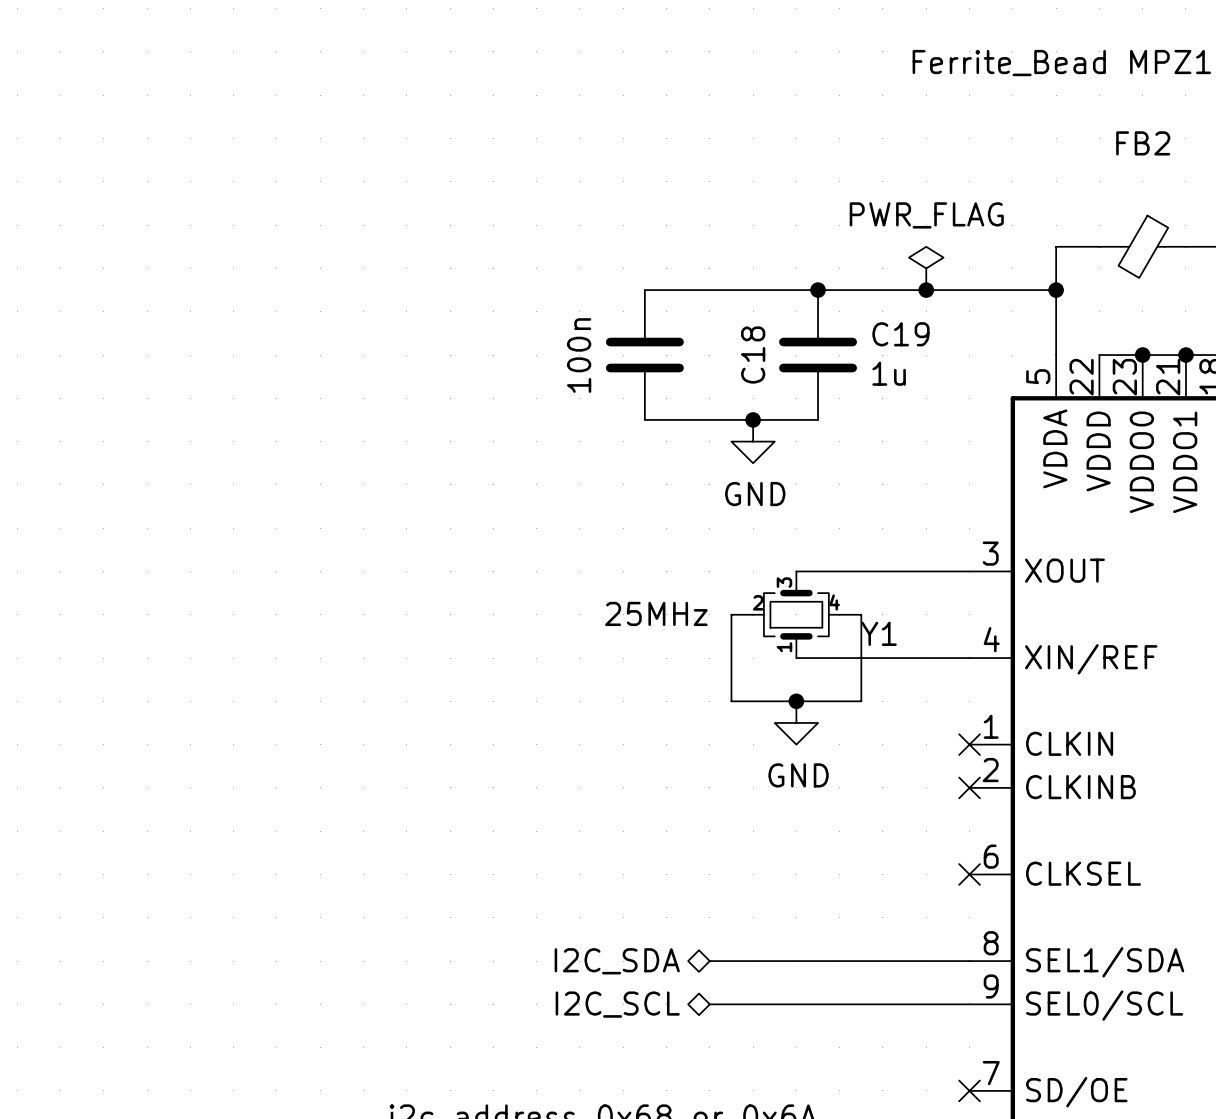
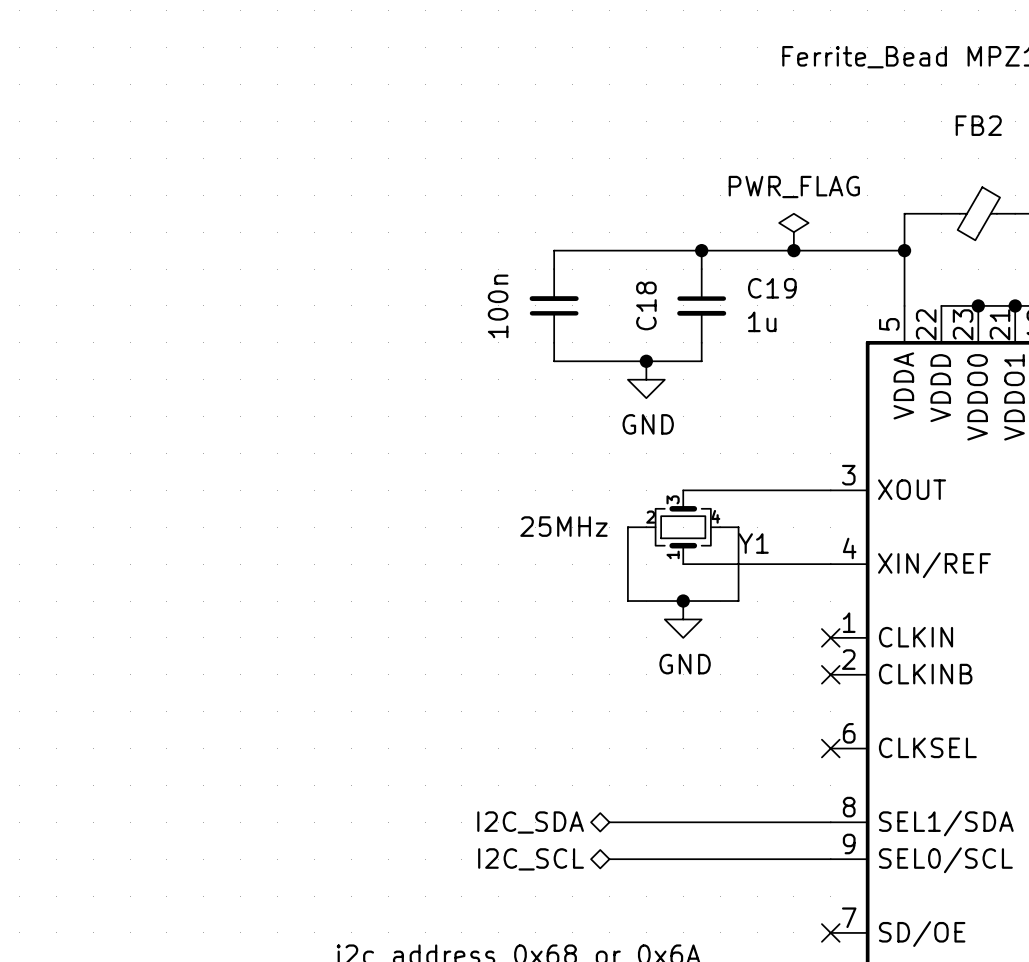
C18 symbol: [605, 290, 684, 420] -> [529, 269, 579, 343]
C19 symbol: [779, 290, 858, 420] -> [677, 269, 727, 343]

